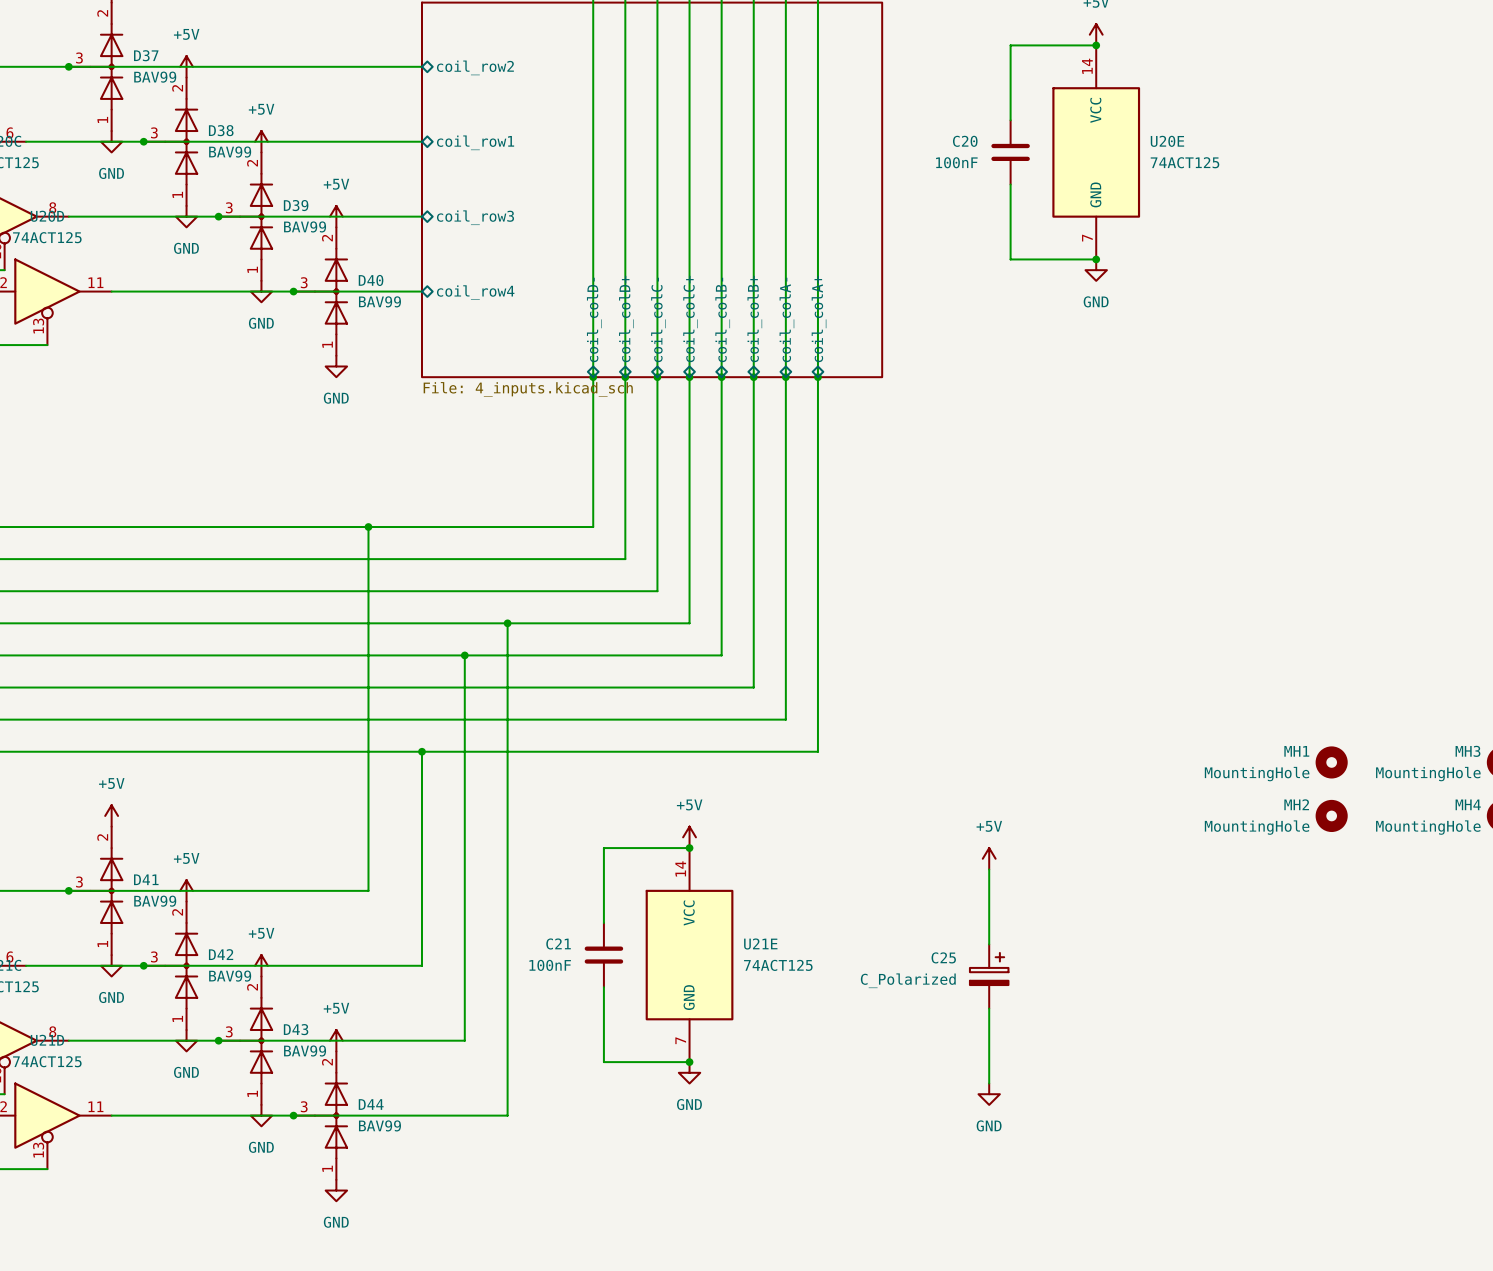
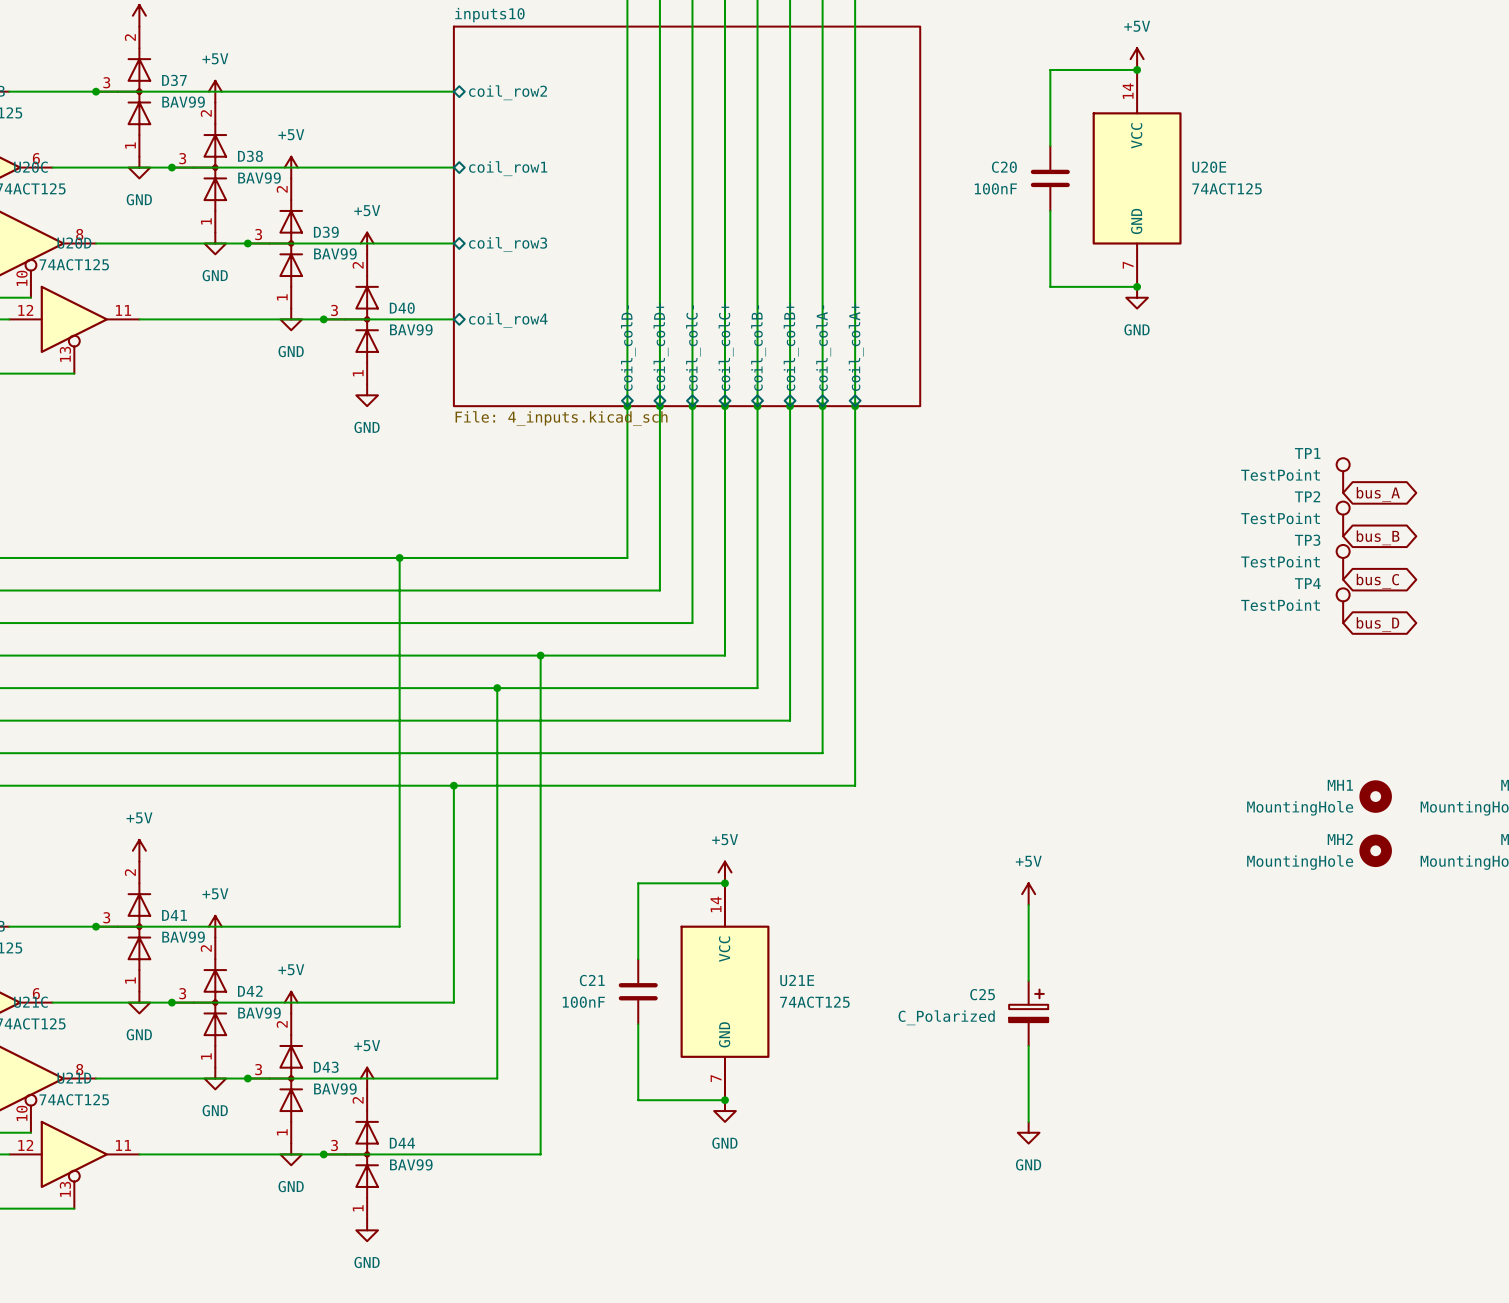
TP1: none -> TestPoint (1343, 475)
global label: none -> bus_A (1378, 494)
TP2: none -> TestPoint (1343, 518)
global label: none -> bus_B (1378, 537)
TP3: none -> TestPoint (1343, 562)
global label: none -> bus_C (1377, 581)
TP4: none -> TestPoint (1343, 605)
global label: none -> bus_D (1377, 624)

